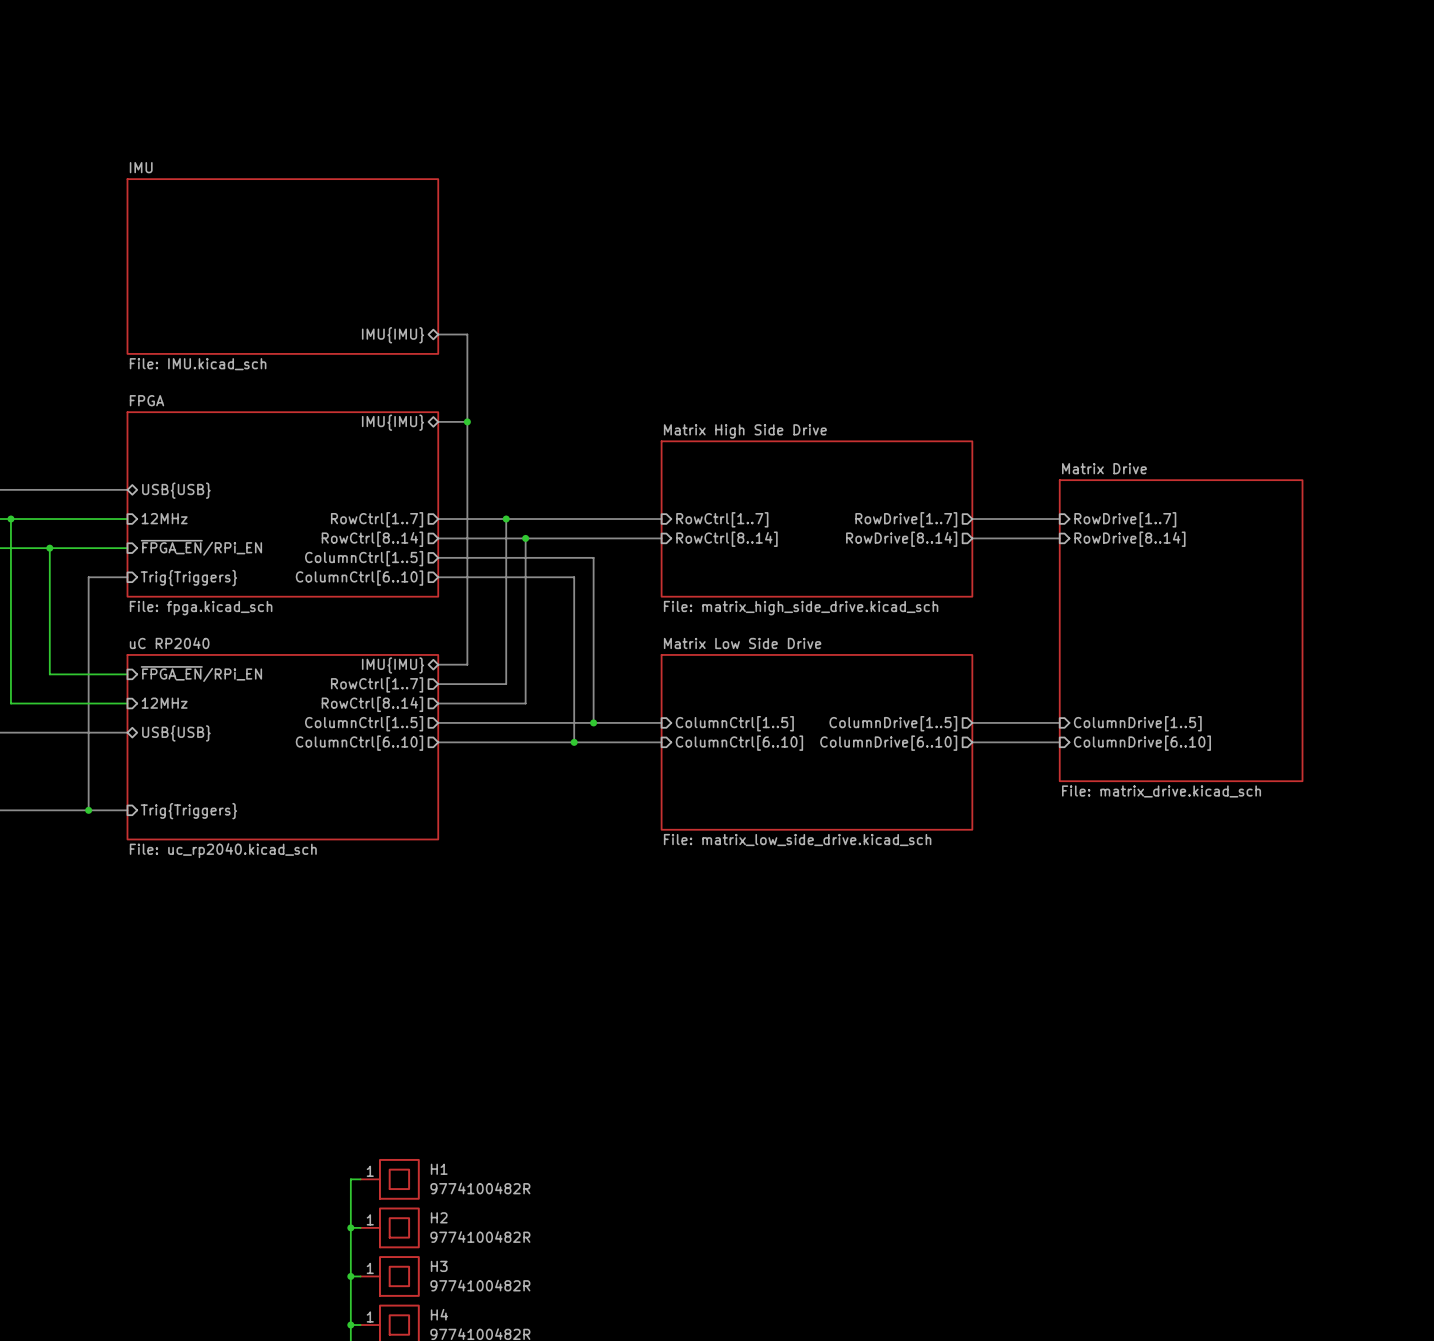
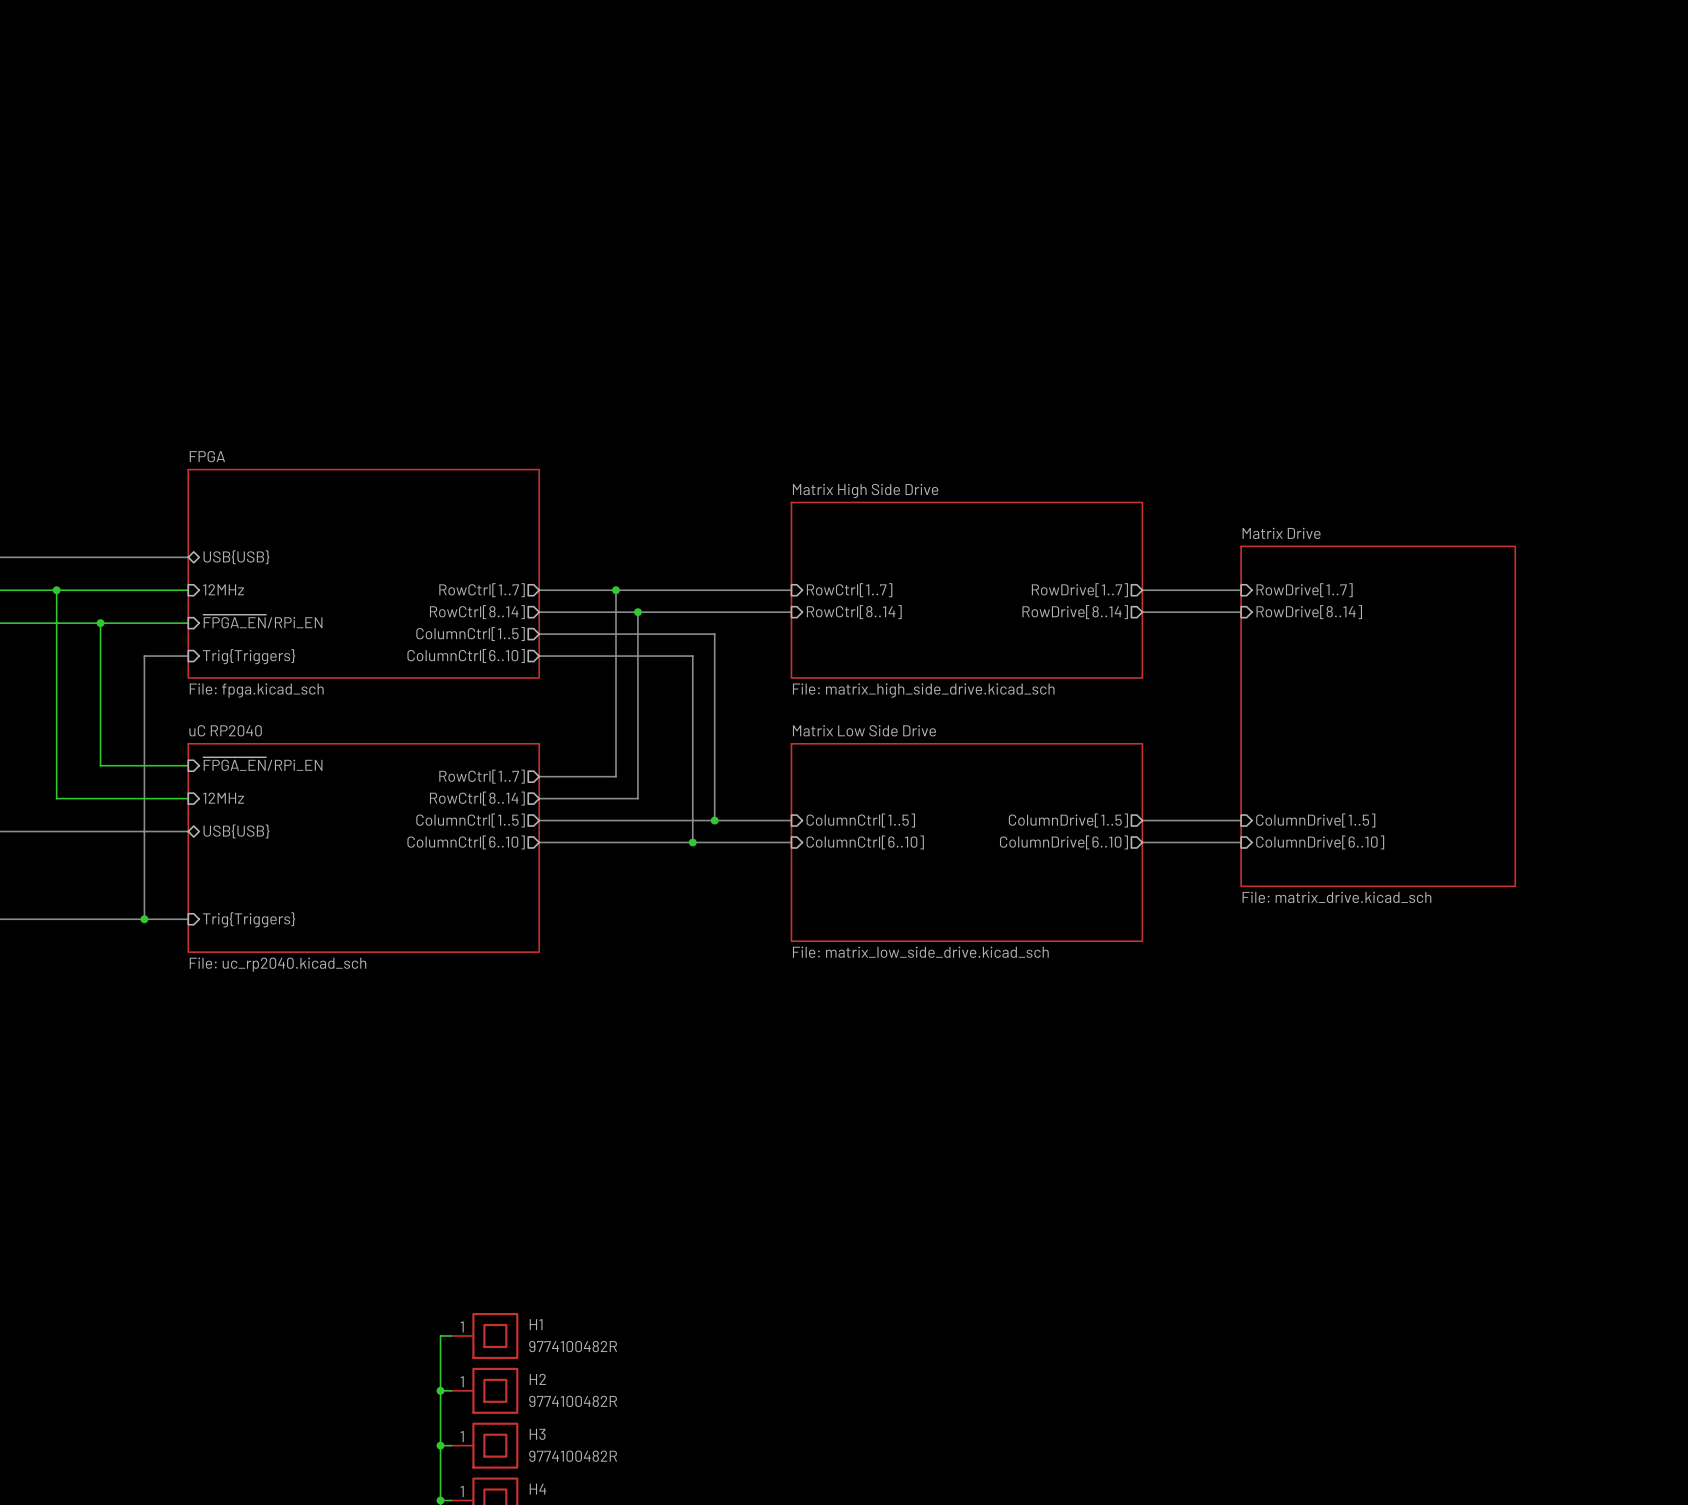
sheet IMU: File: IMU.kicad_sch (282, 266) -> none
bus: (438, 334) (467, 334) (467, 664) (438, 664) -> none
sheet pin: IMU{IMU} (393, 335) -> none
bus: (438, 421) (467, 421) -> none
junction: (467, 421) -> none
sheet pin: IMU{IMU} (393, 422) -> none
sheet pin: IMU{IMU} (393, 665) -> none

